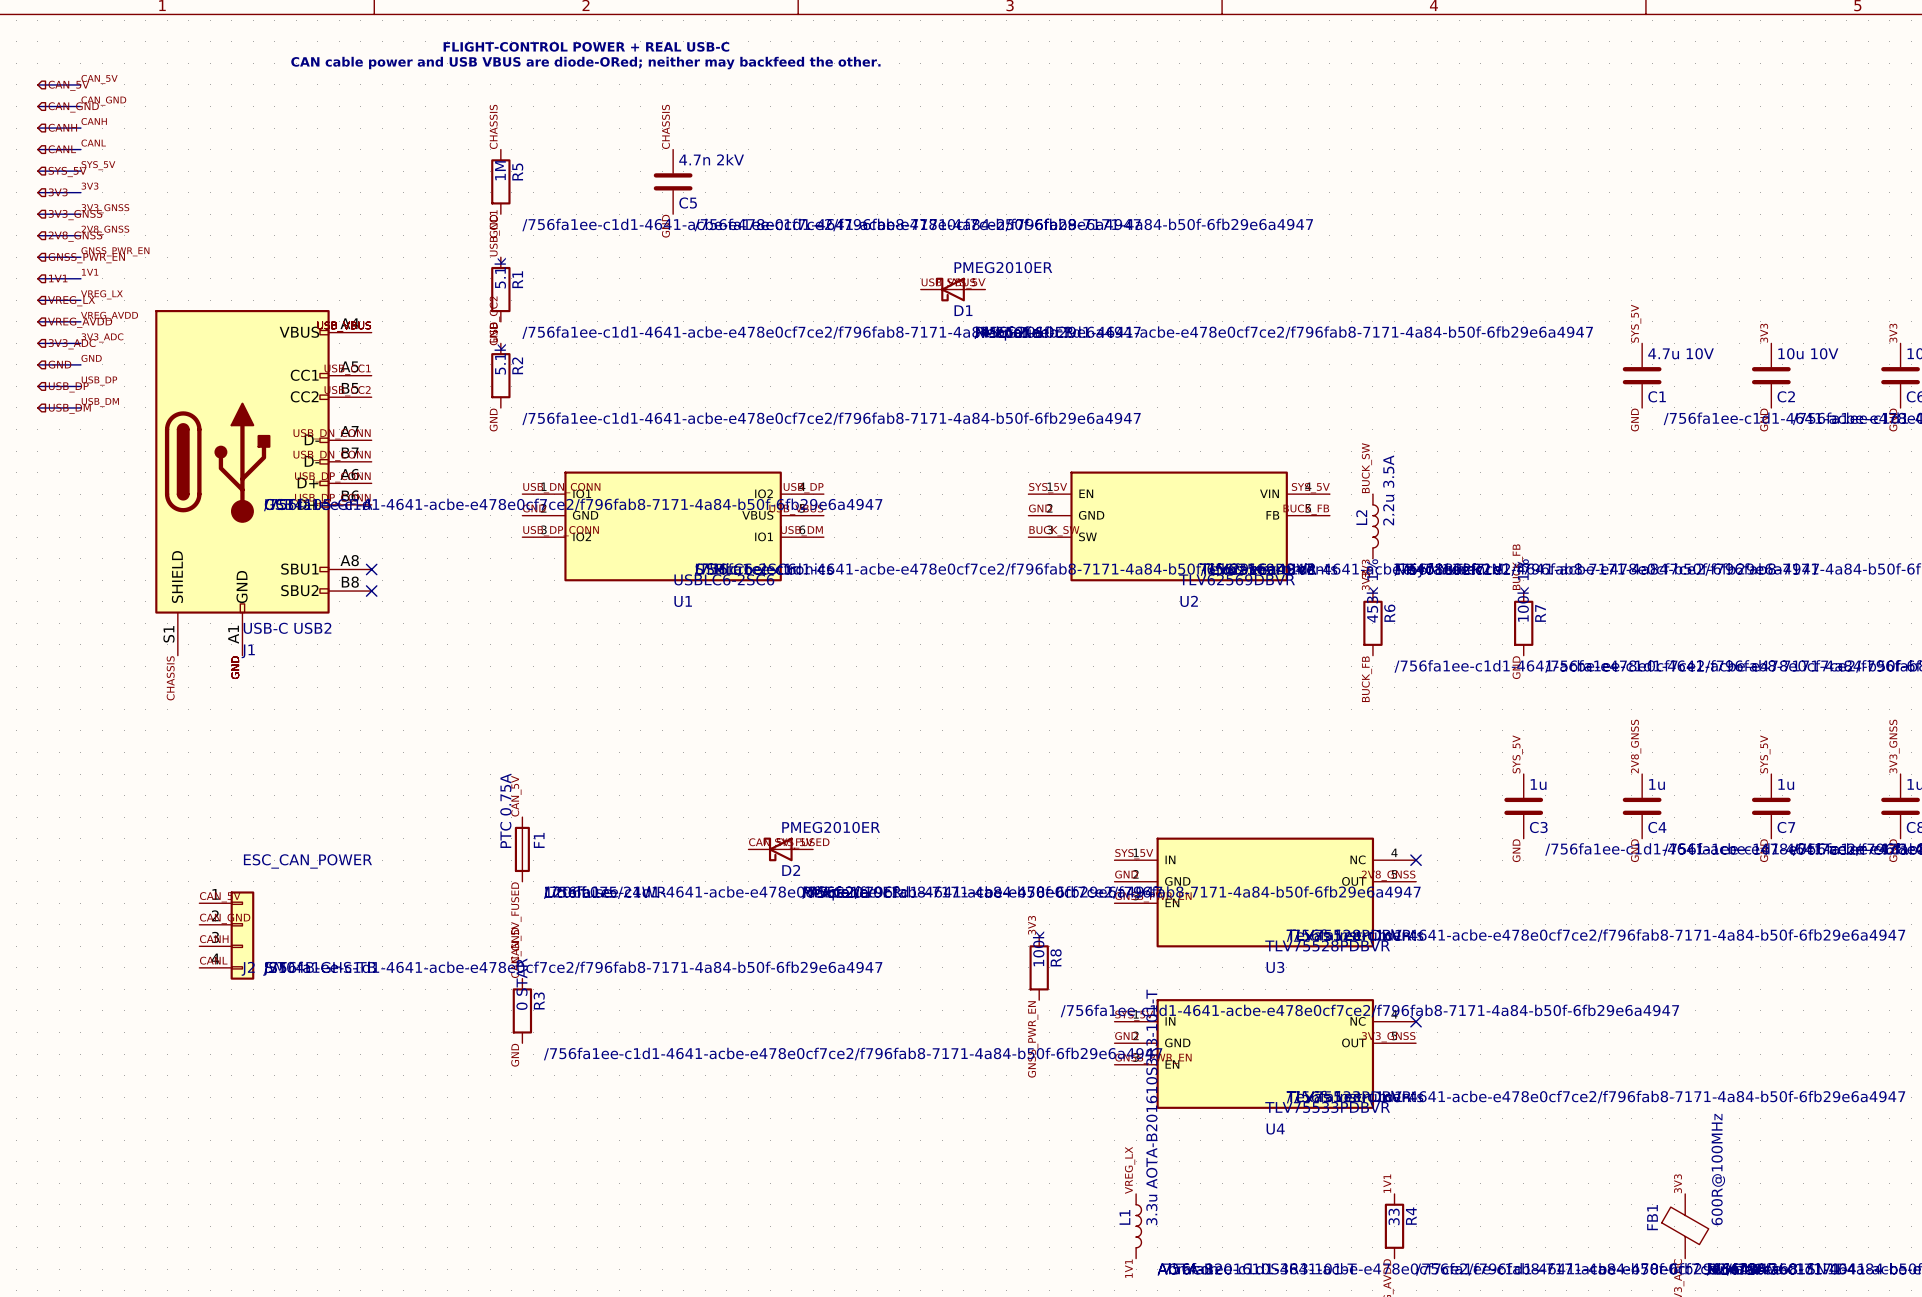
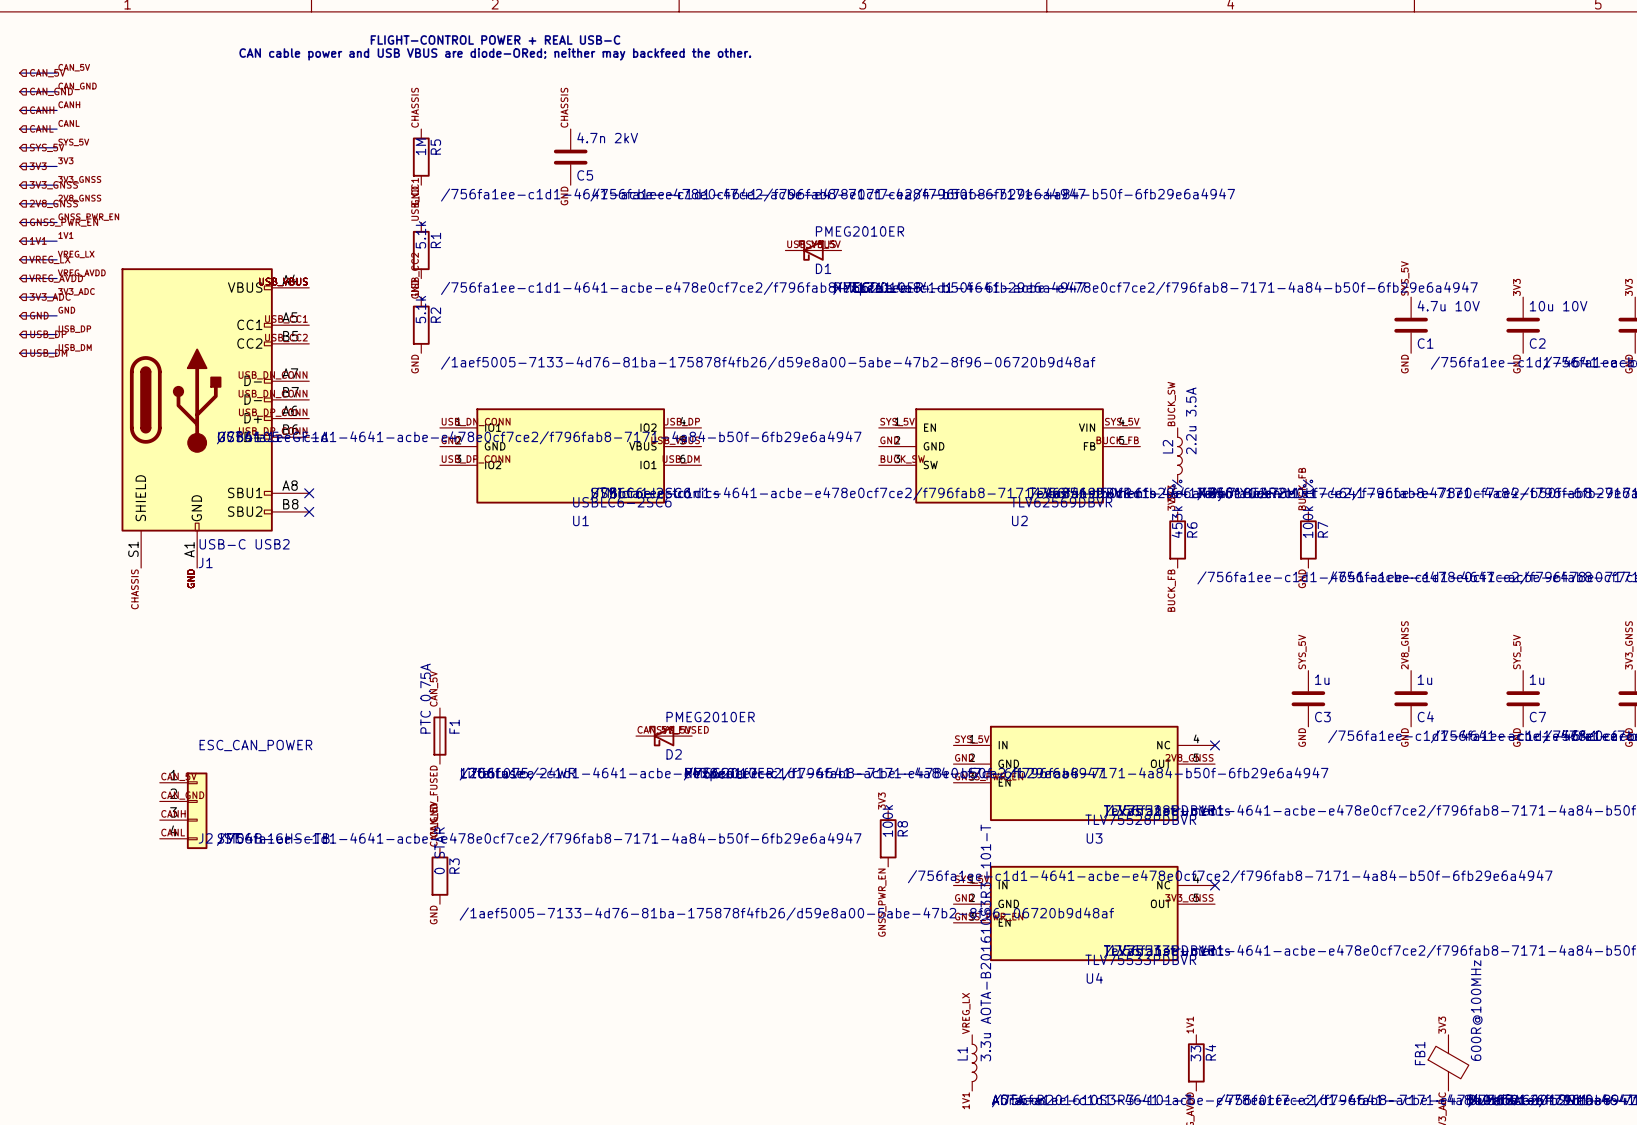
R2 text: /756fa1ee-c1d1-4641-acbe-e478e0cf7ce2/f796fab8-7171-4a84-b50f-6fb29e6a4947 (831, 418) -> /1aef5005-7133-4d76-81ba-175878f4fb26/d59e8a00-5abe-47b2-8f96-06720b9d48af (768, 363)
R3 text: /756fa1ee-c1d1-4641-acbe-e478e0cf7ce2/f796fab8-7171-4a84-b50f-6fb29e6a4947 (853, 1054) -> /1aef5005-7133-4d76-81ba-175878f4fb26/d59e8a00-5abe-47b2-8f96-06720b9d48af (786, 914)

